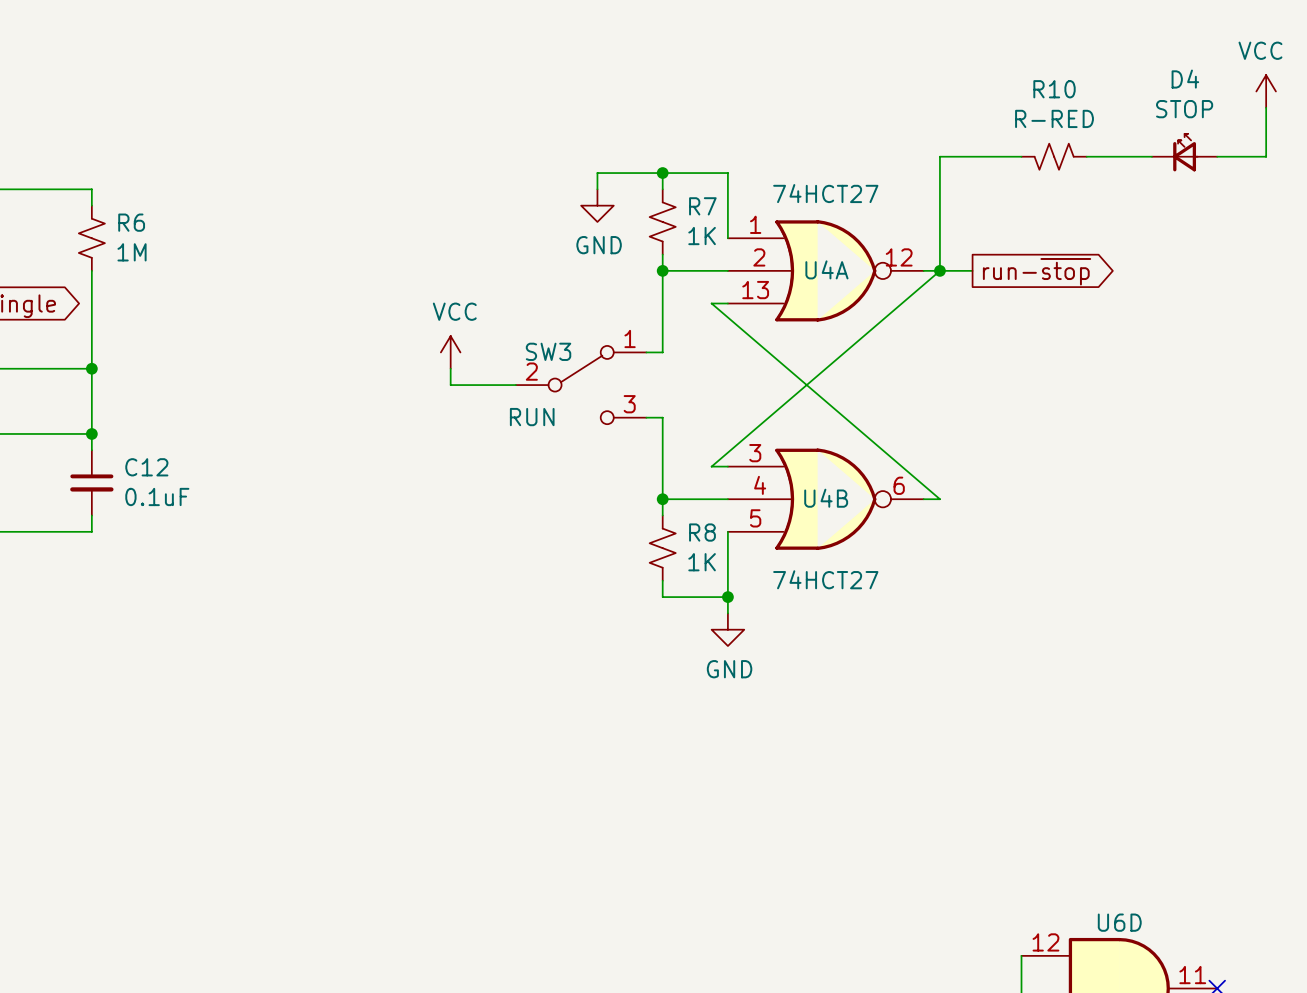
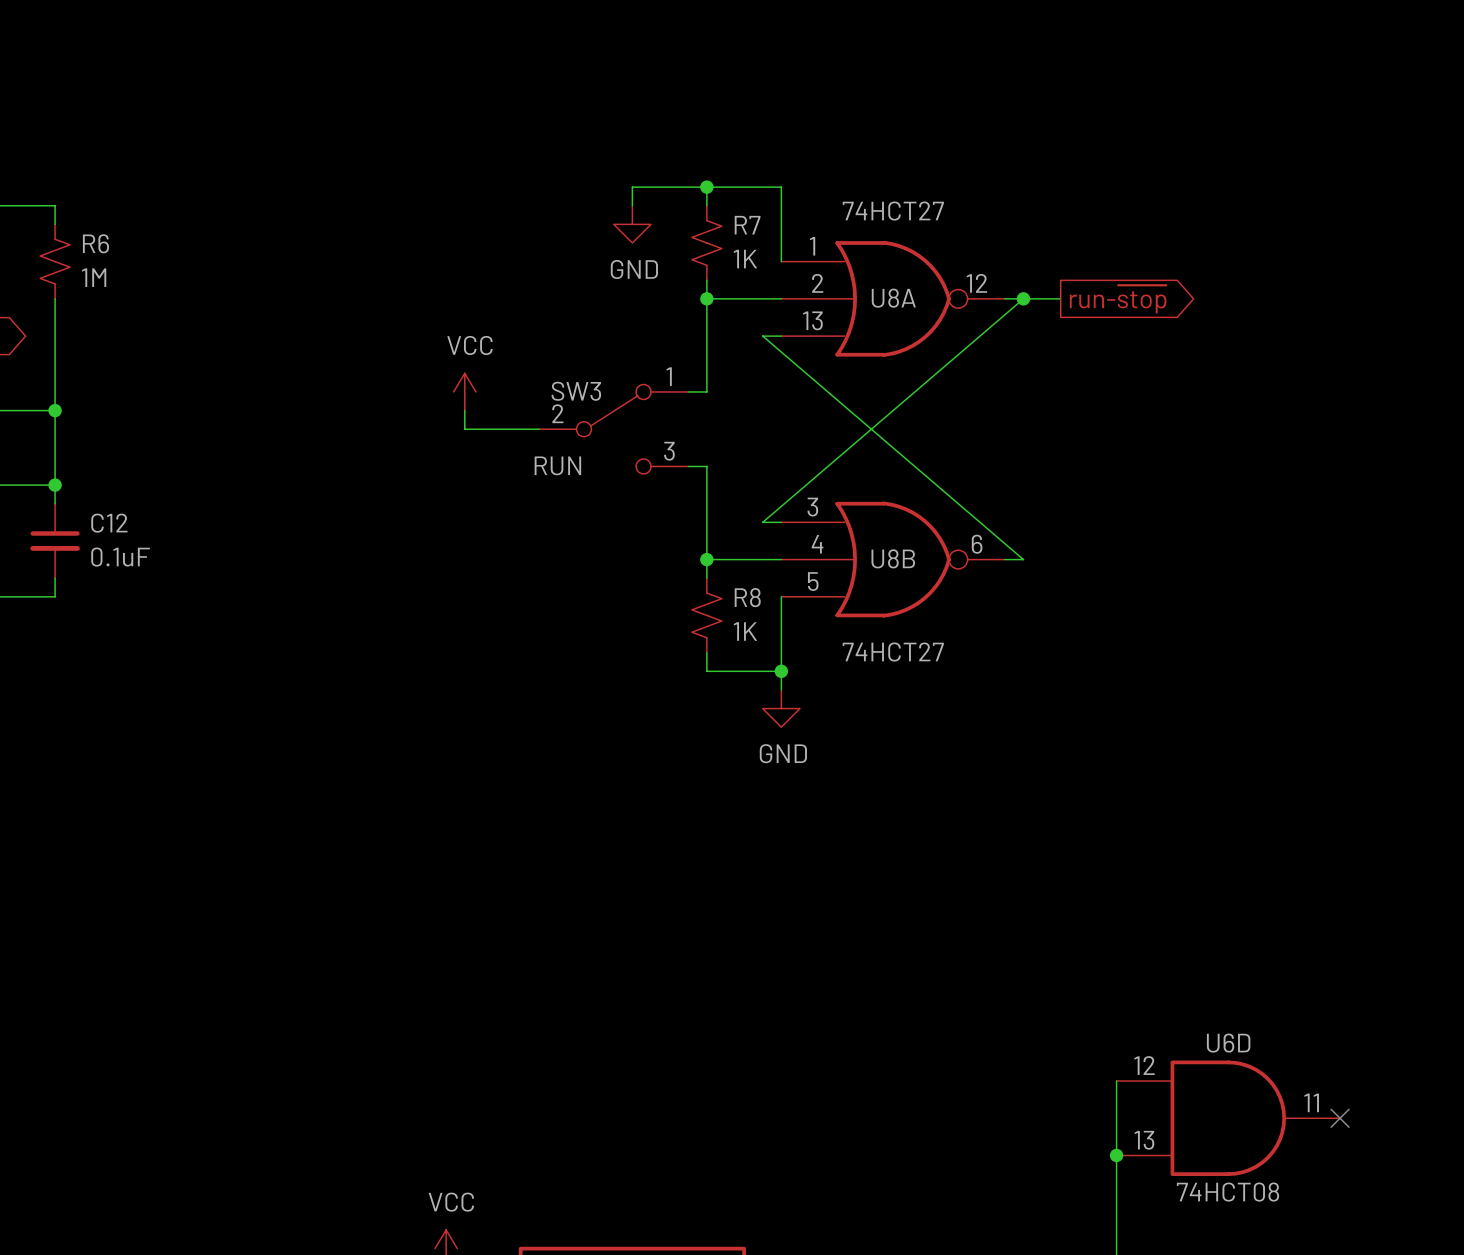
power symbol: VCC (1266, 91) -> none
wire: (1266, 107) (1266, 156) (1217, 156) -> none
D4: STOP (1184, 152) -> none
wire: (1021, 156) (939, 156) (939, 270) -> none
R10: R-RED (1054, 156) -> none
wire: (1086, 156) (1151, 156) -> none
U4A name: U4A (826, 269) -> U8A (893, 298)
U4B name: U4B (826, 498) -> U8B (893, 558)

